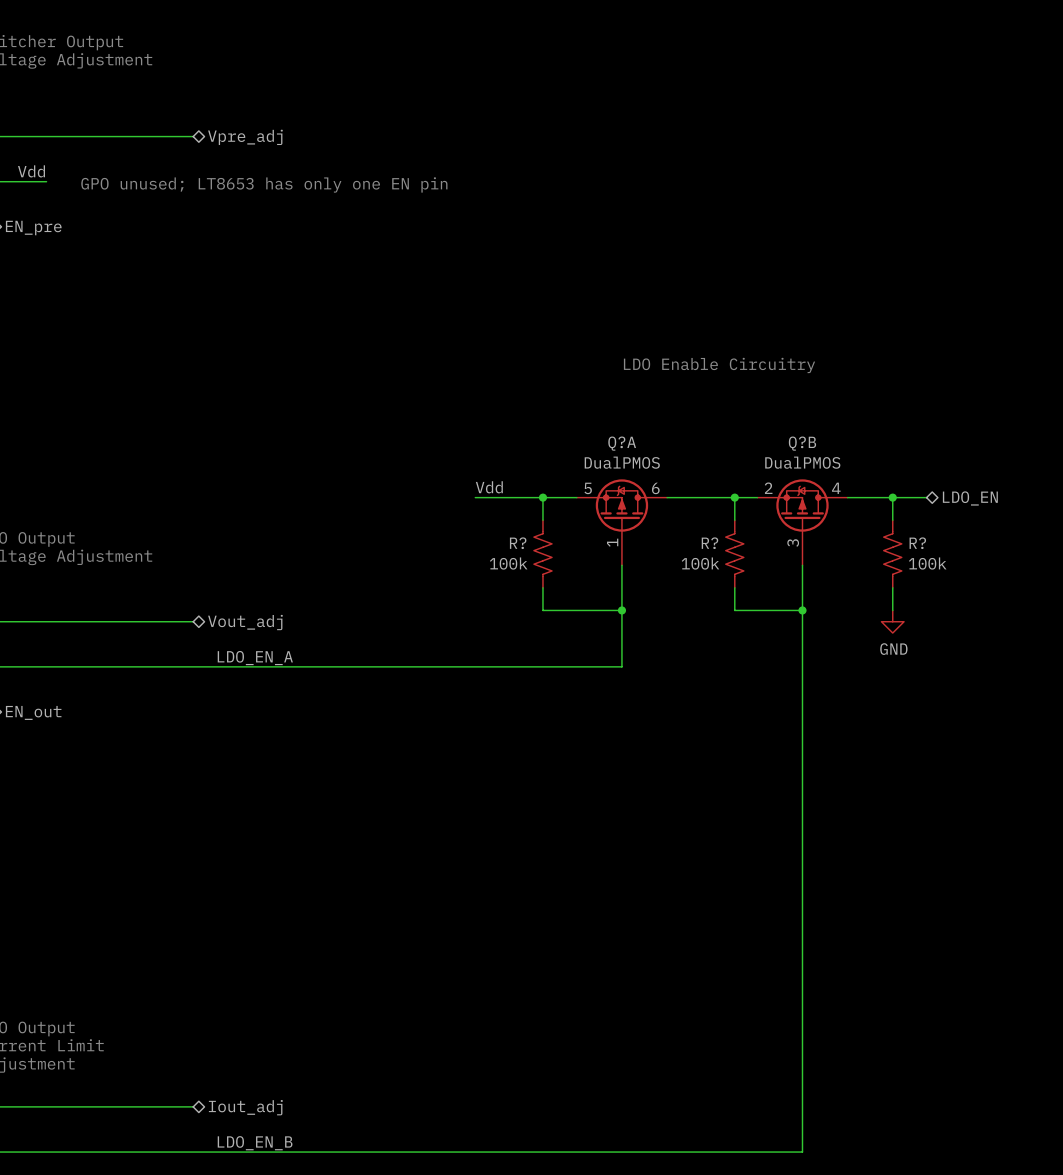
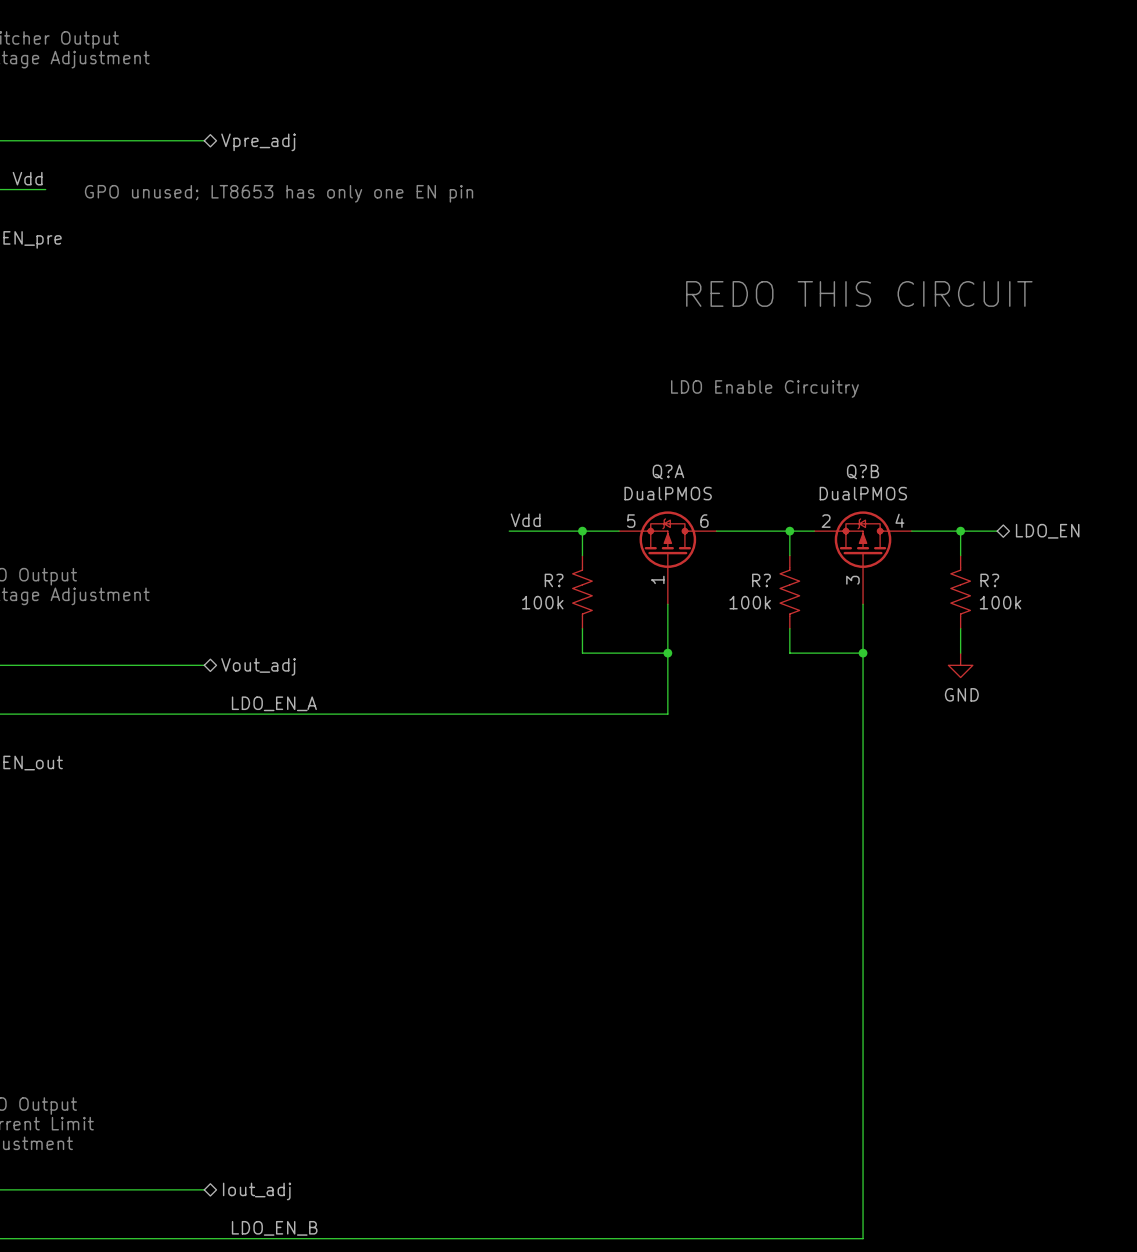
text: none -> REDO THIS CIRCUIT (859, 293)

